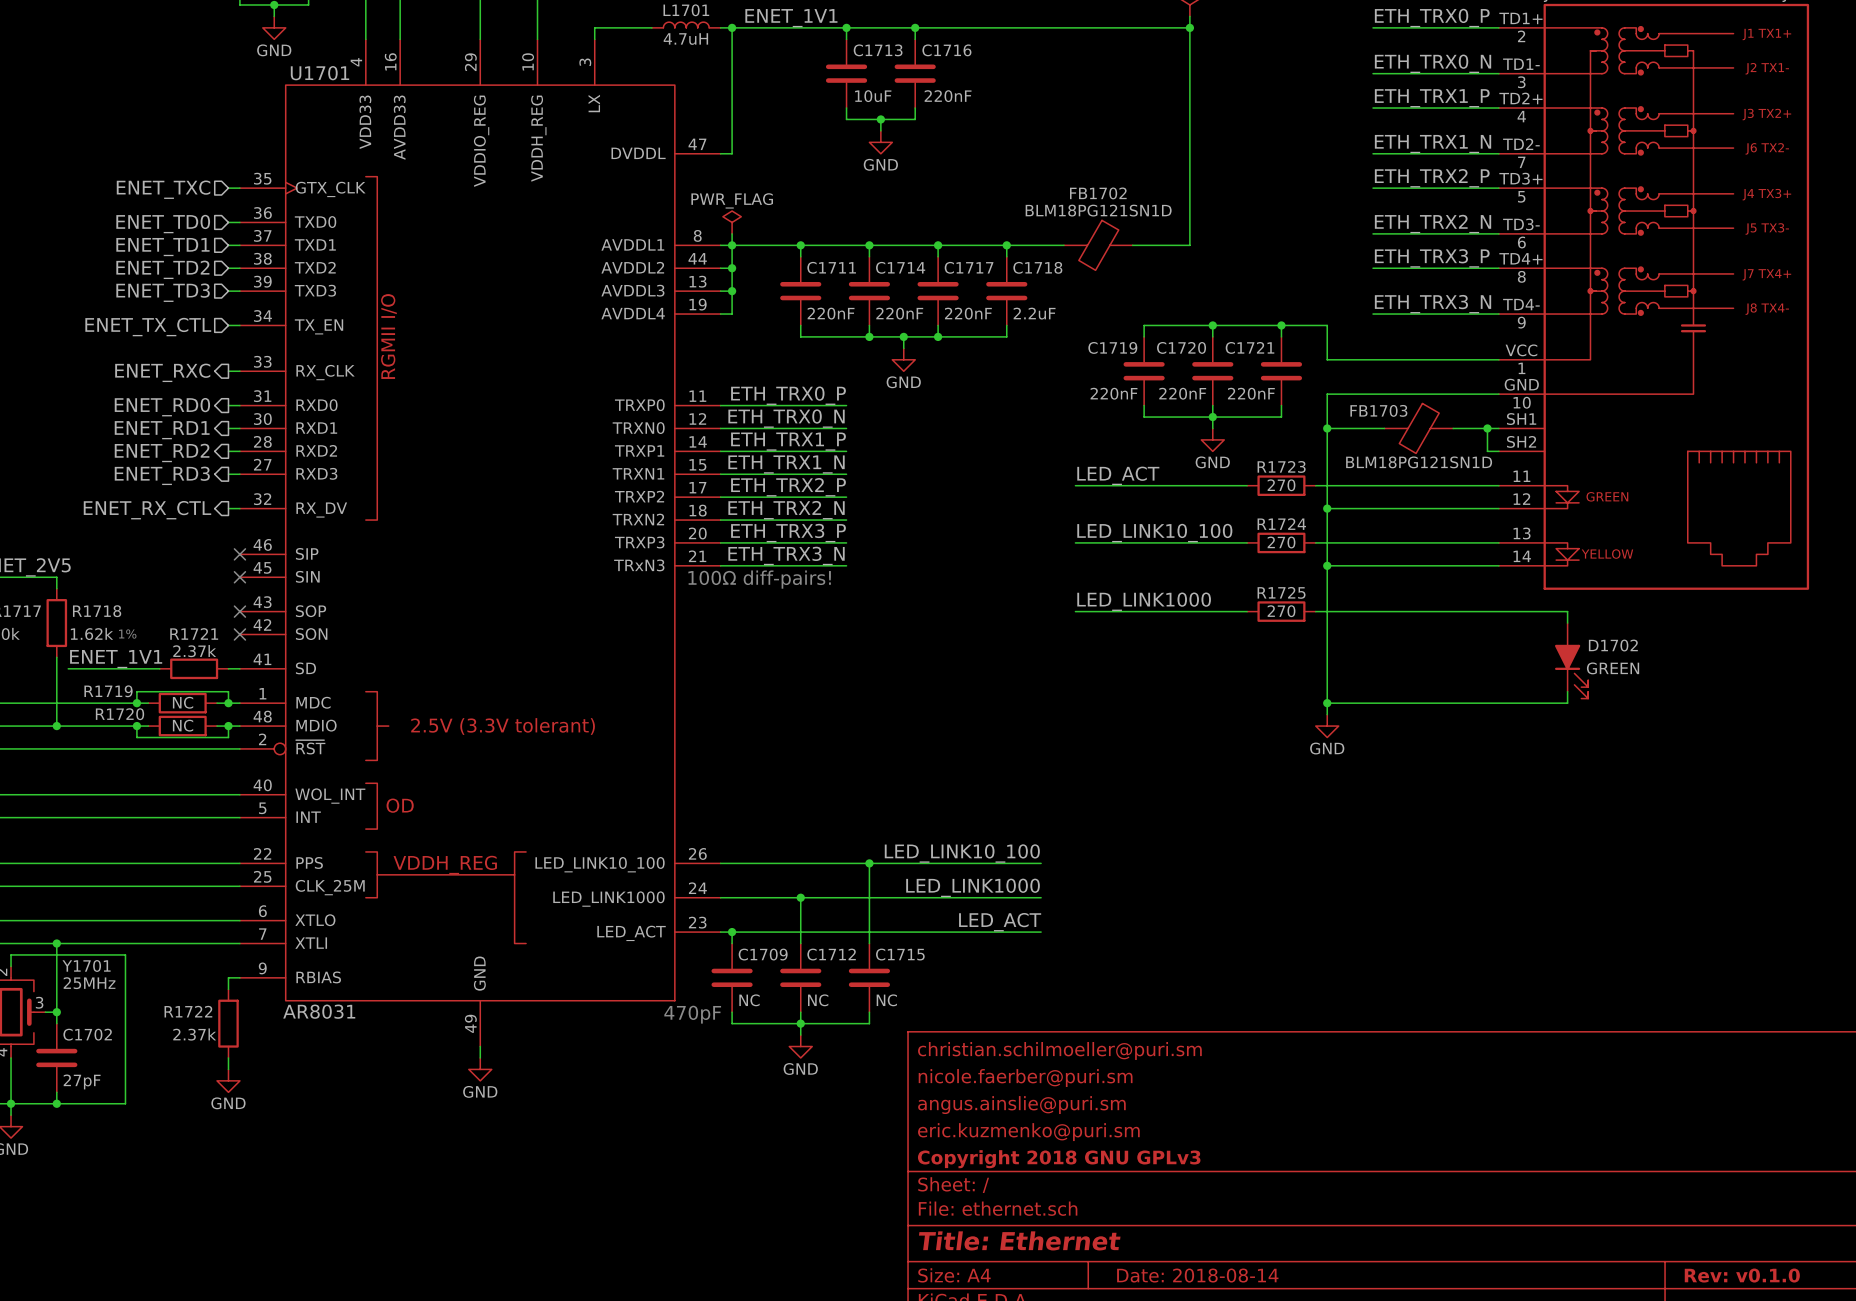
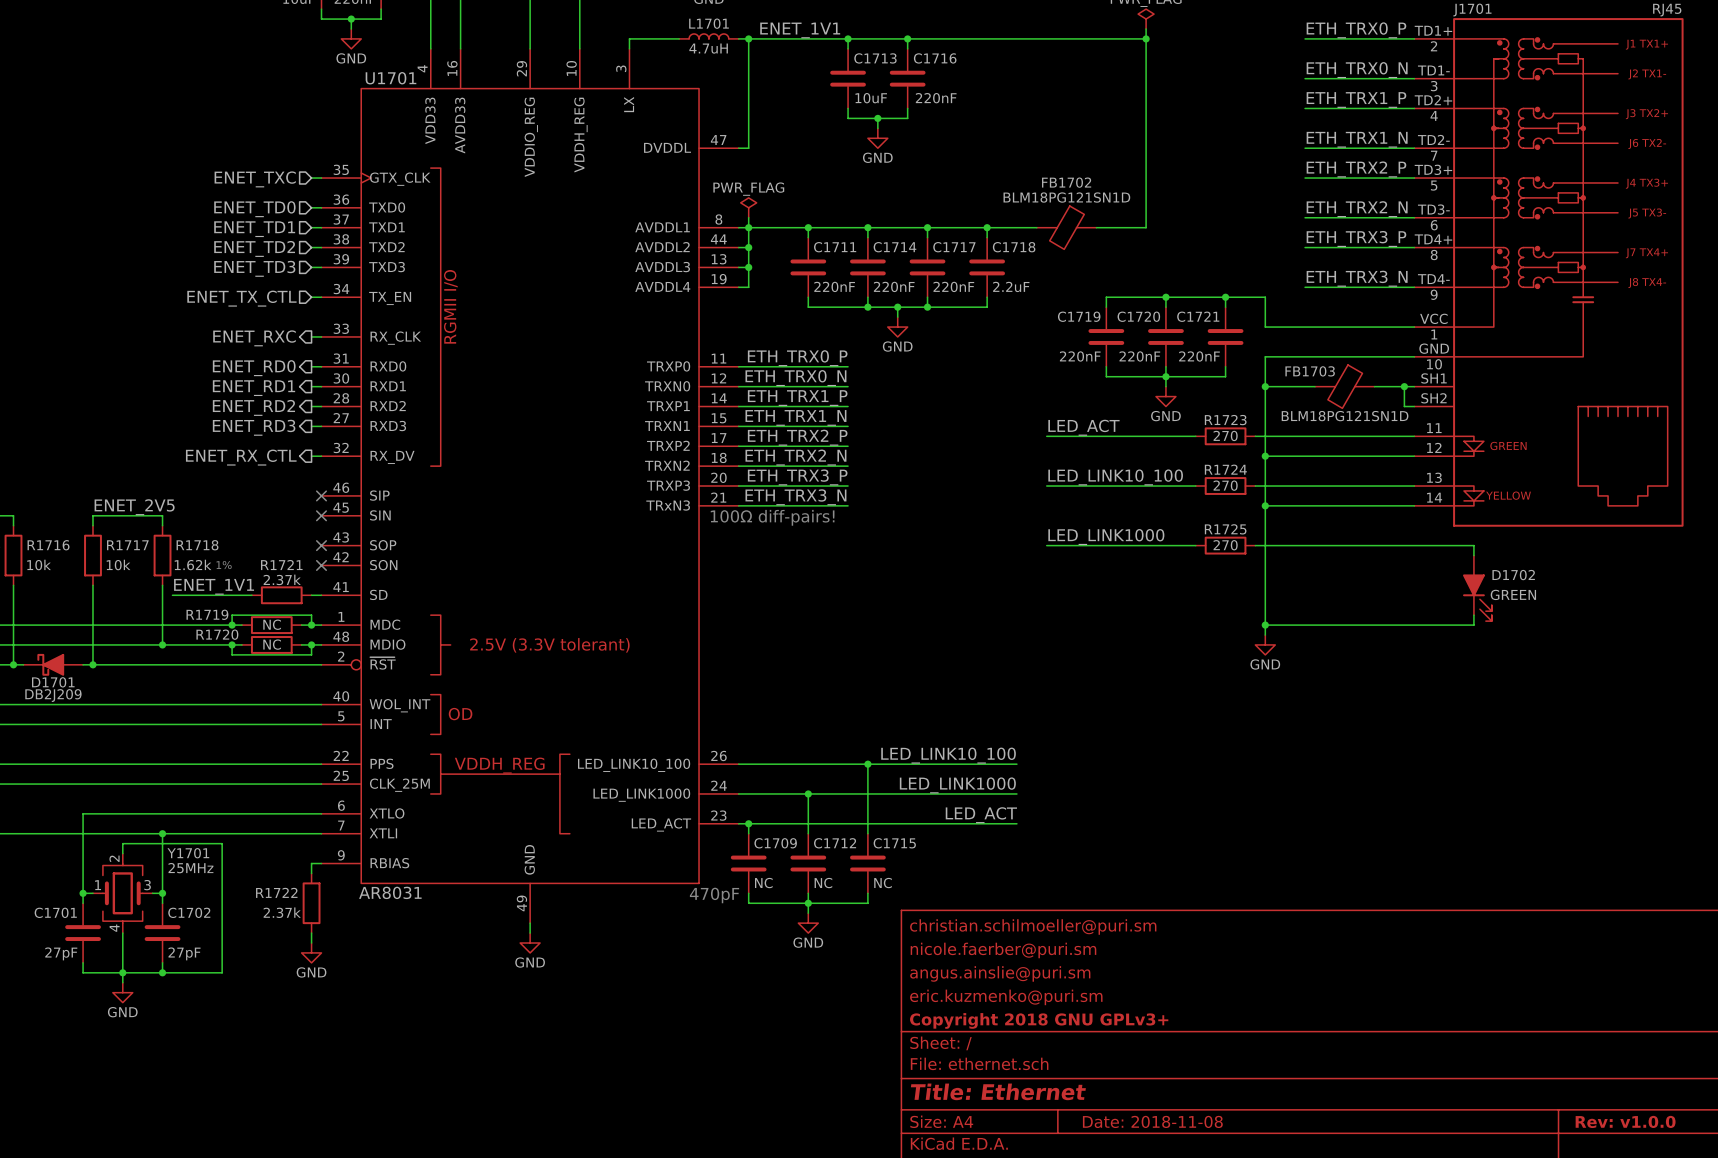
title block: Copyright 2018 GNU GPLv3 (1059, 1159) -> Copyright 2018 GNU GPLv3+ (1039, 1020)
title block: Date: 2018-08-14 (1197, 1275) -> Date: 2018-11-08 (1152, 1121)
title block: Rev: v0.1.0 (1742, 1275) -> Rev: v1.0.0 (1625, 1121)

